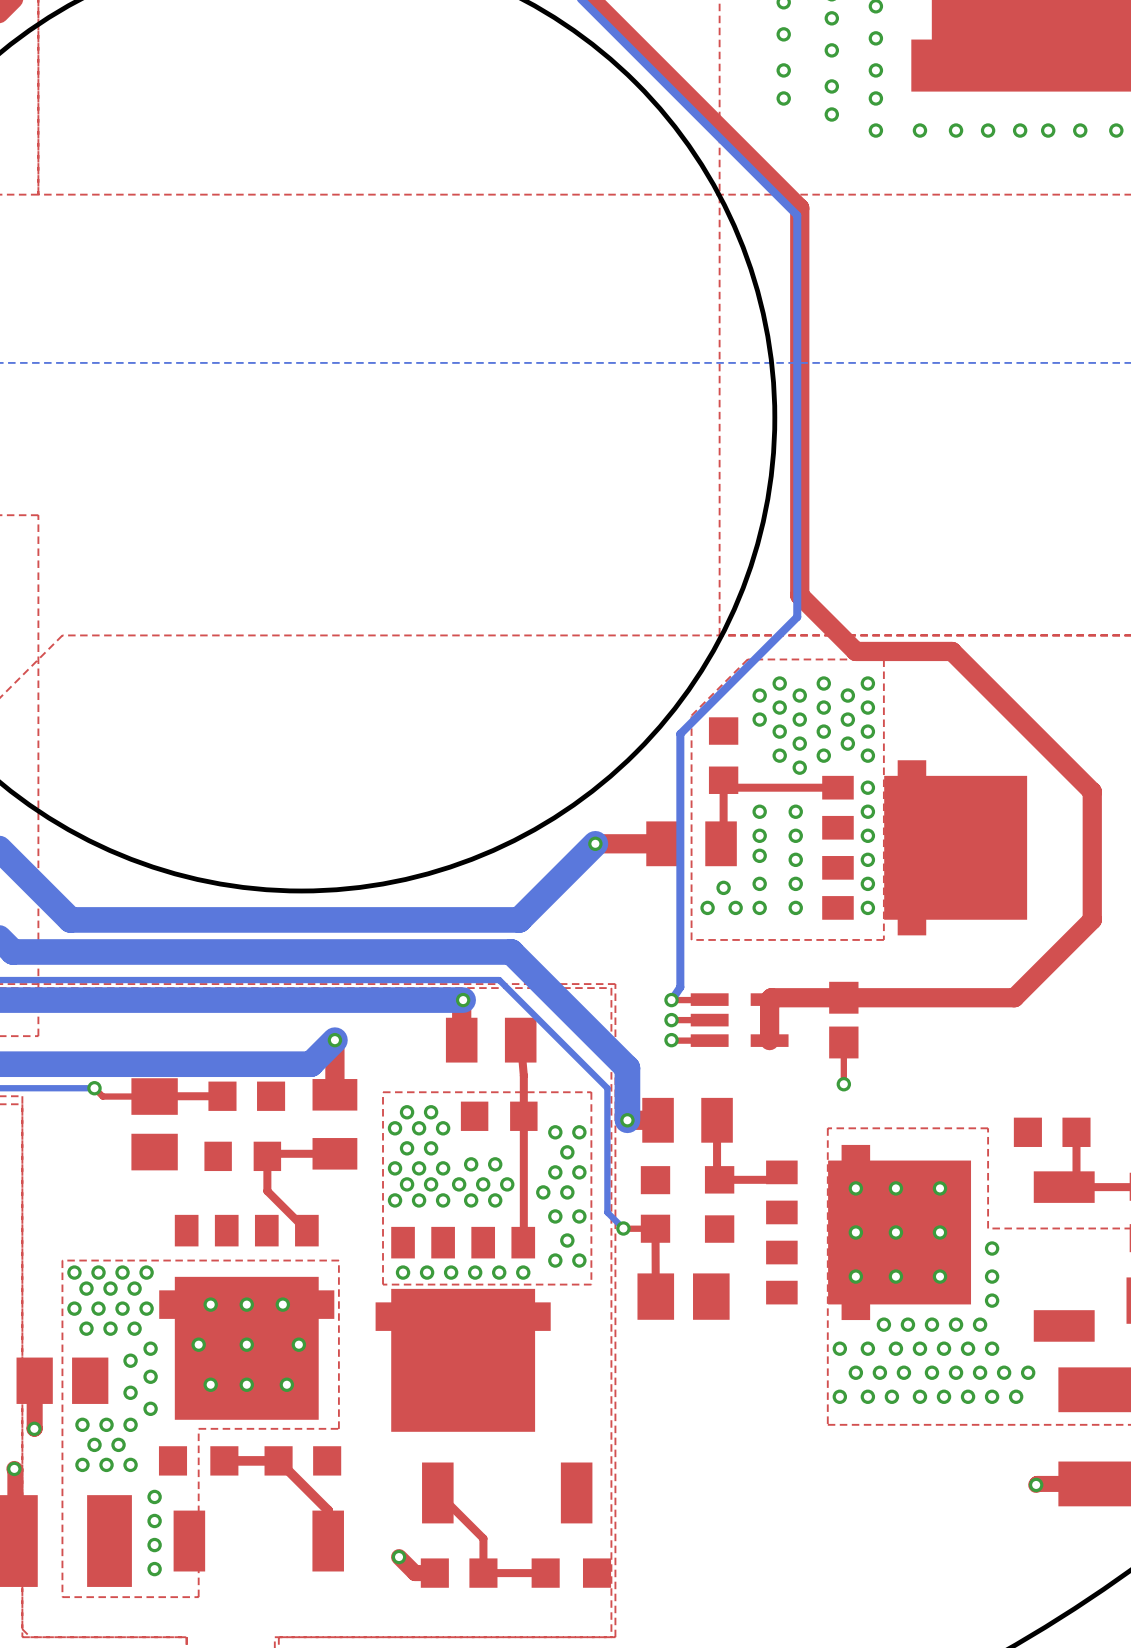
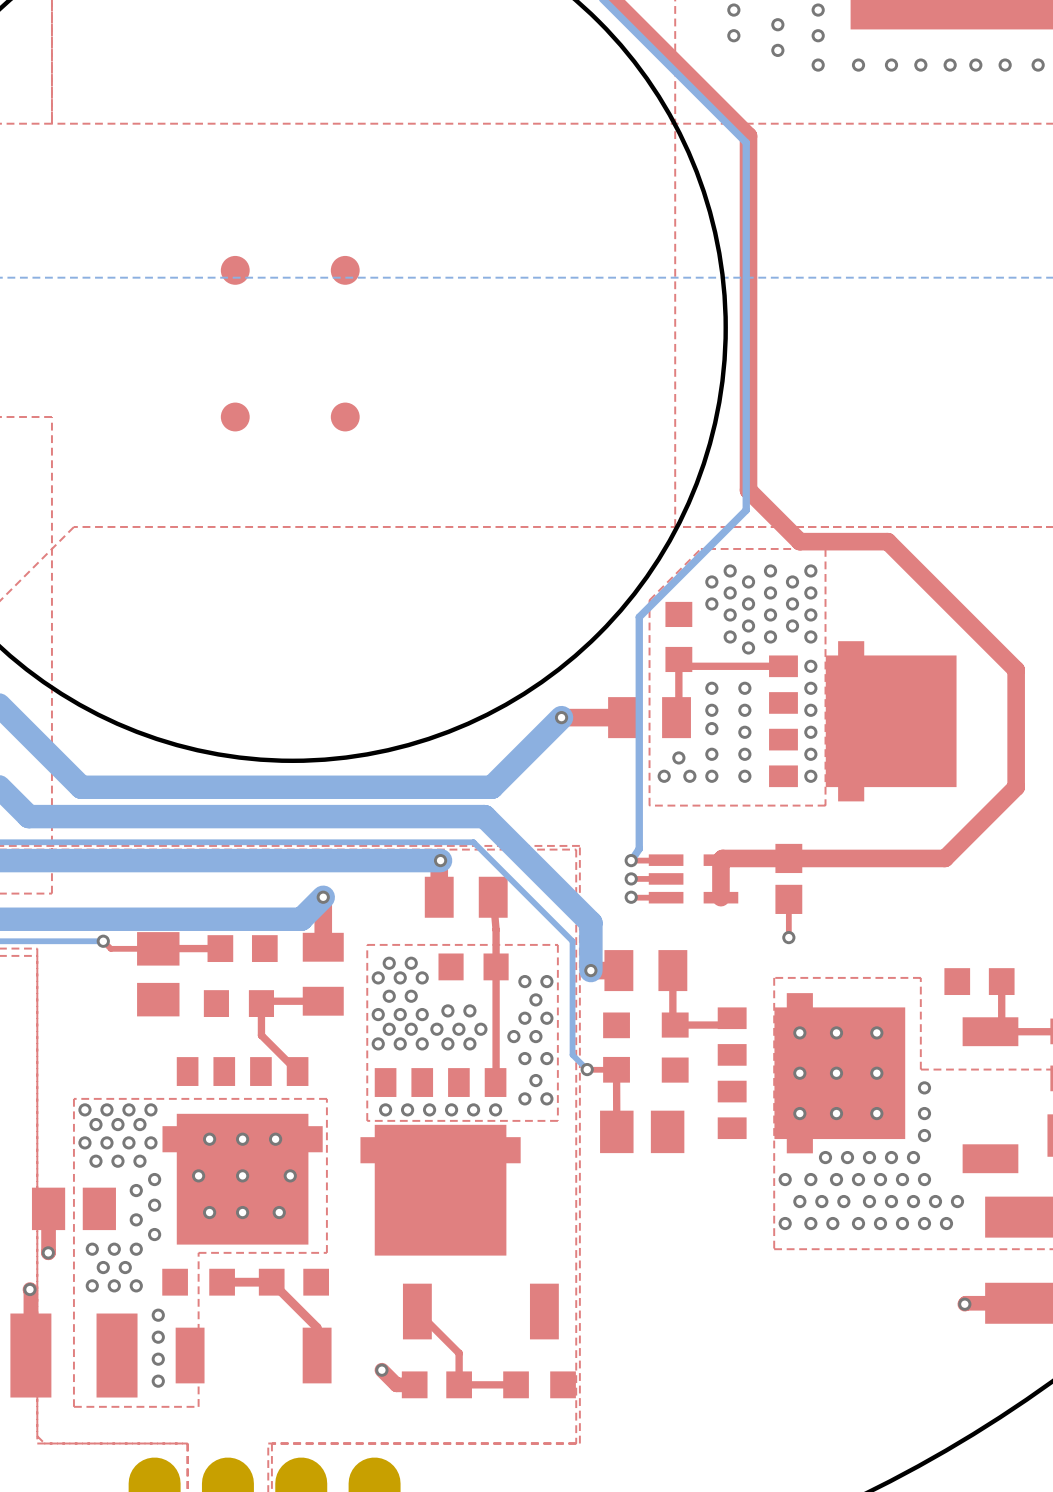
part: none -> (235, 270)
part: none -> (345, 270)
part: none -> (235, 417)
part: none -> (345, 417)

